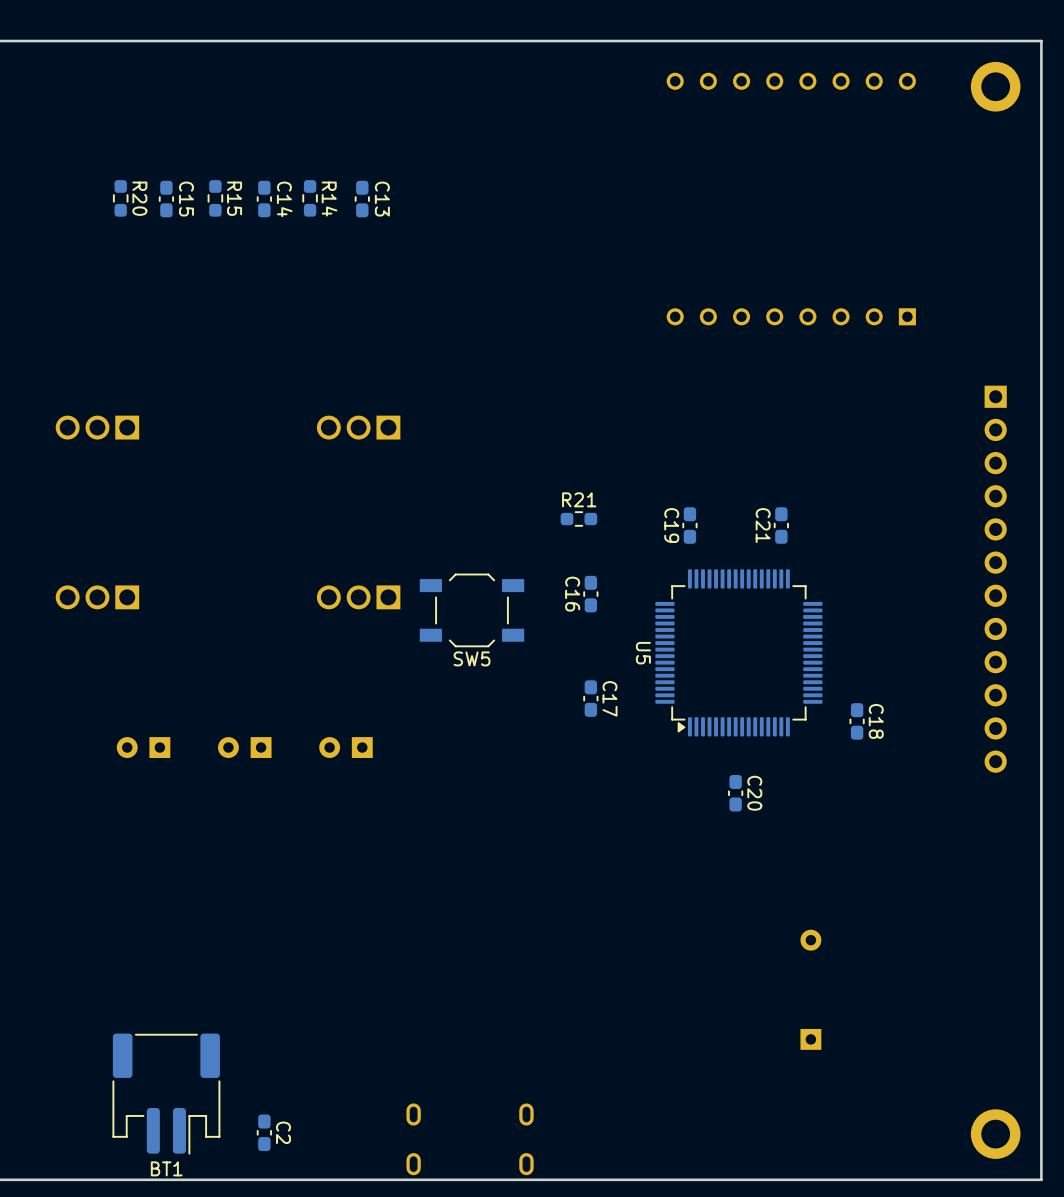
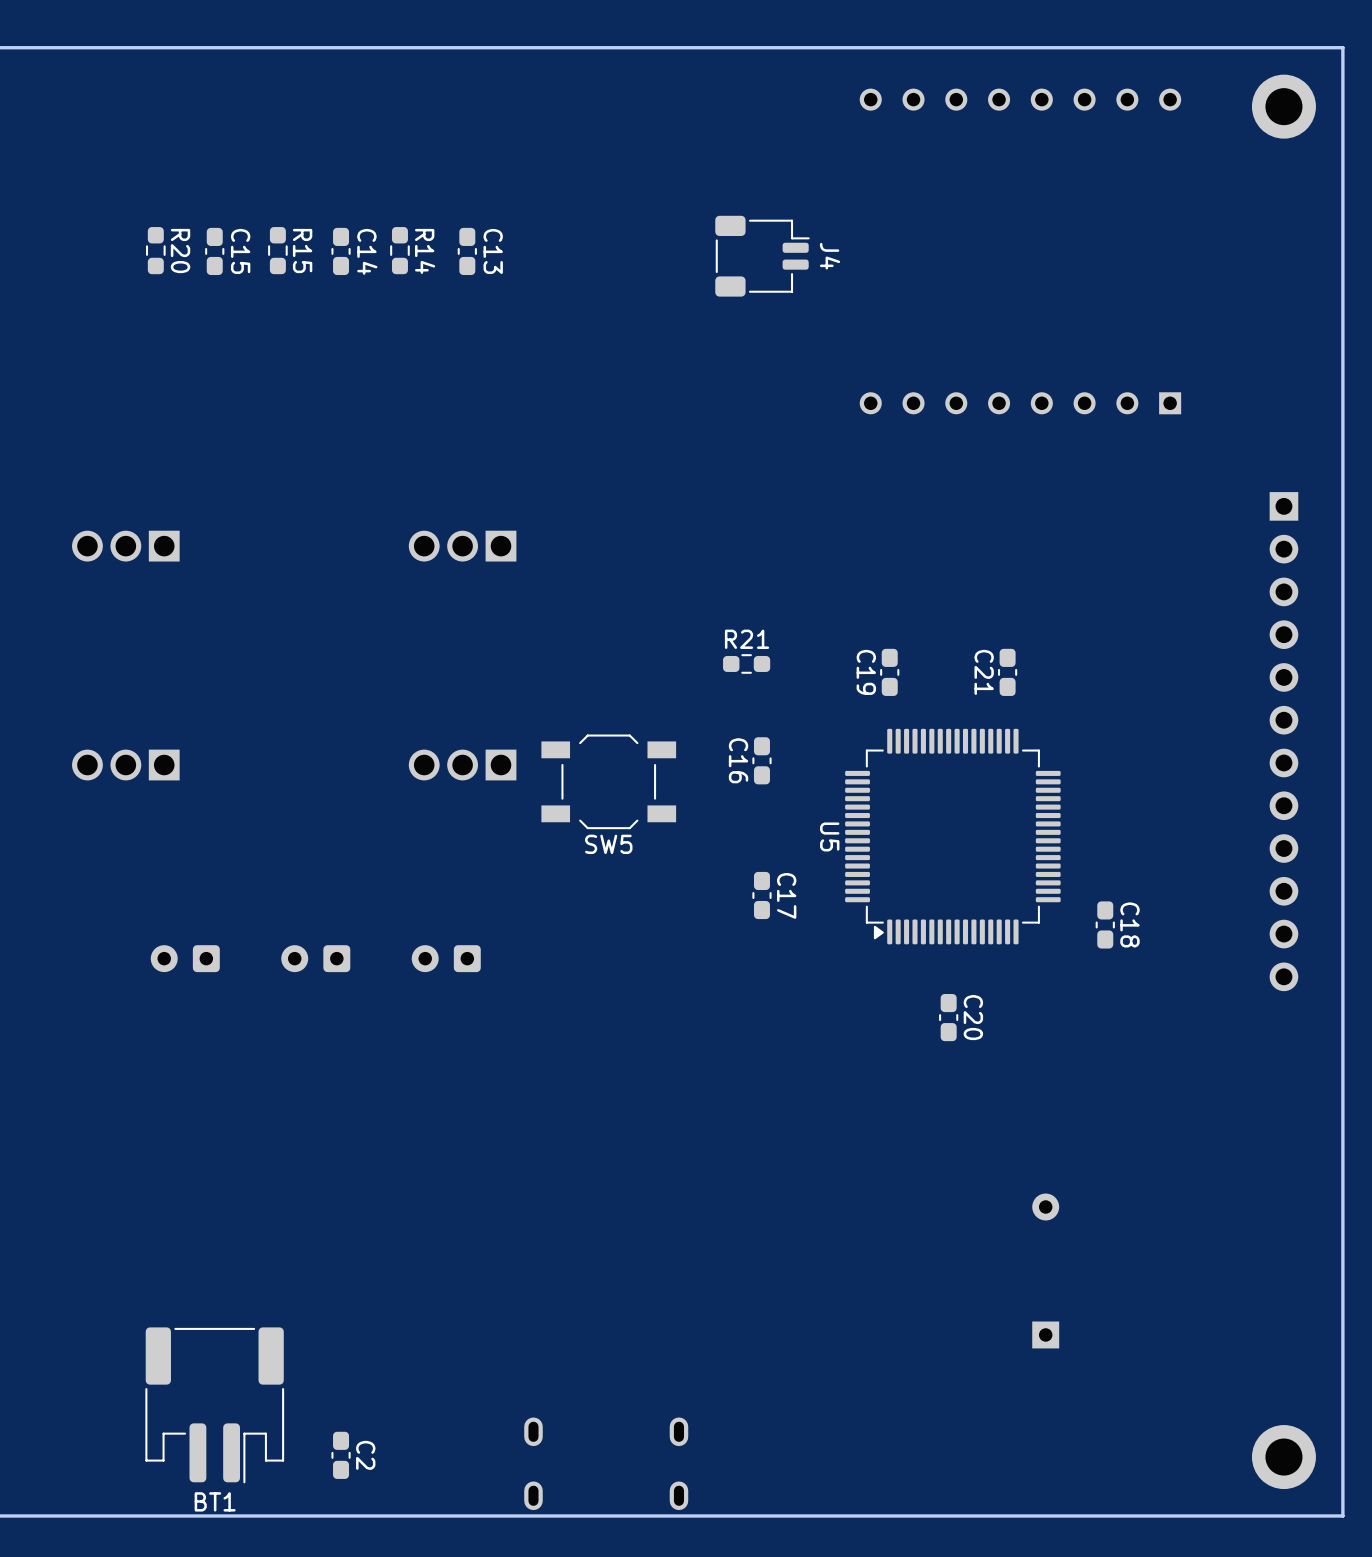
J4: none -> (762, 256)
part footprint: [116, 737, 171, 758] -> [150, 945, 220, 973]
part footprint: [217, 737, 272, 758] -> [281, 945, 351, 973]
part footprint: [319, 737, 373, 758] -> [411, 945, 481, 973]

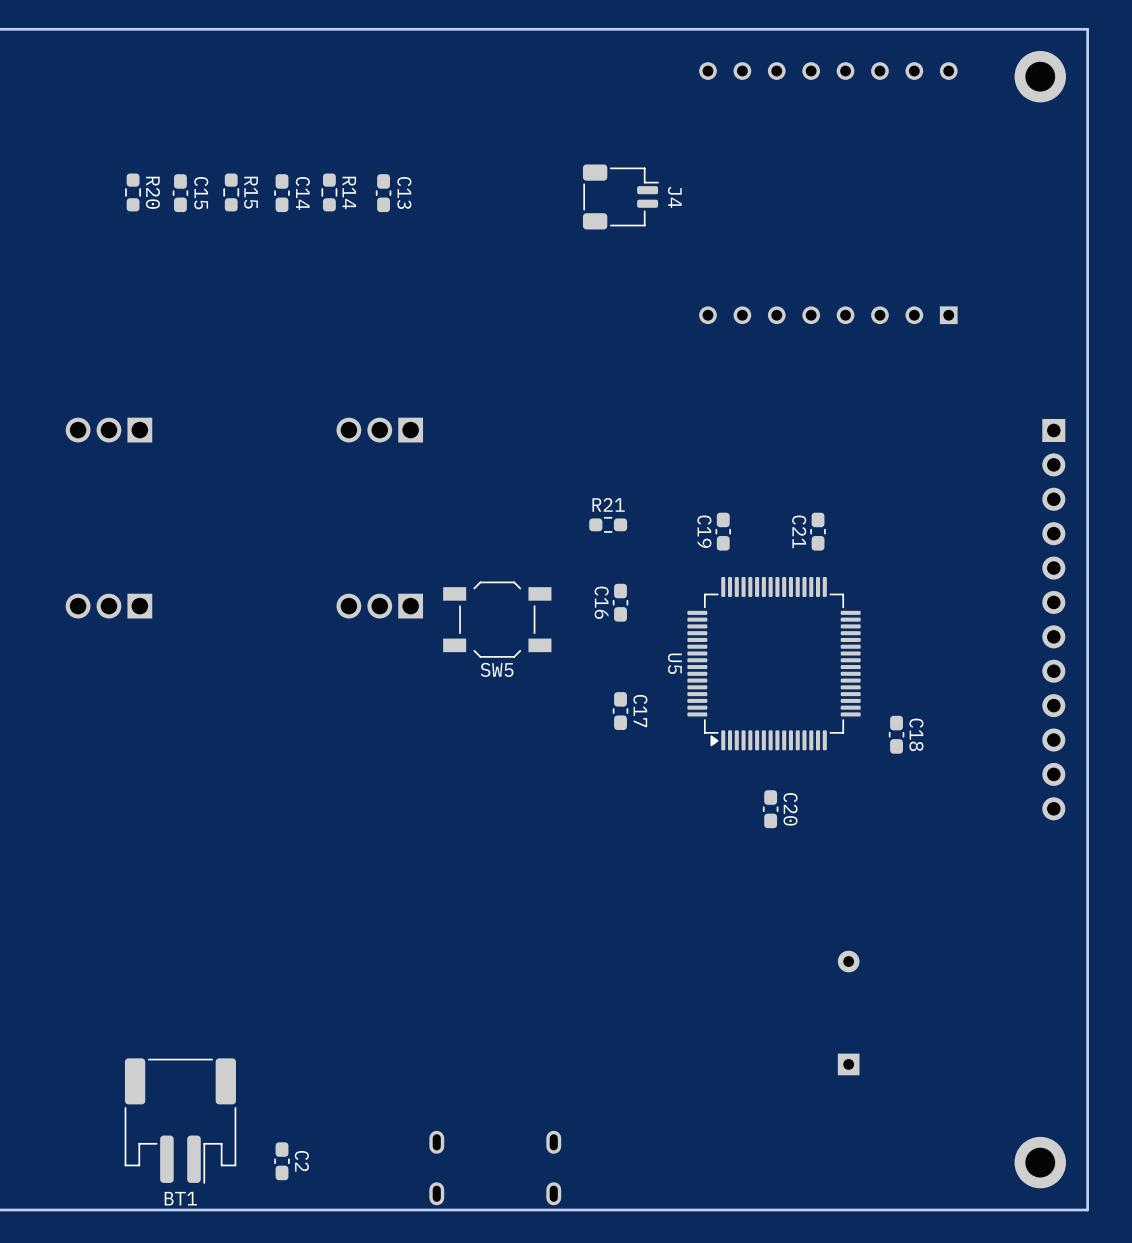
part position: (1283, 741) -> (1053, 619)
part: (185, 958) -> none
part: (315, 958) -> none
part: (446, 958) -> none

